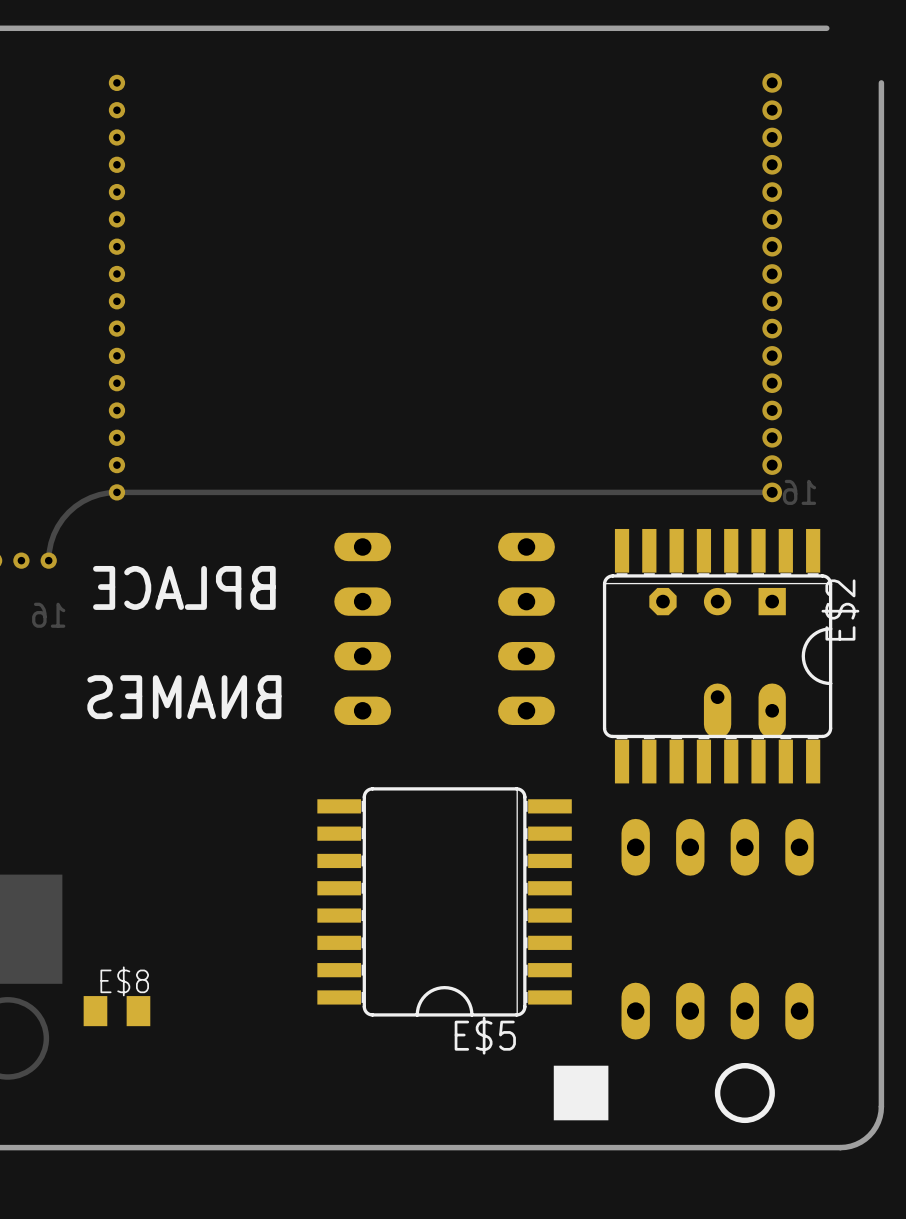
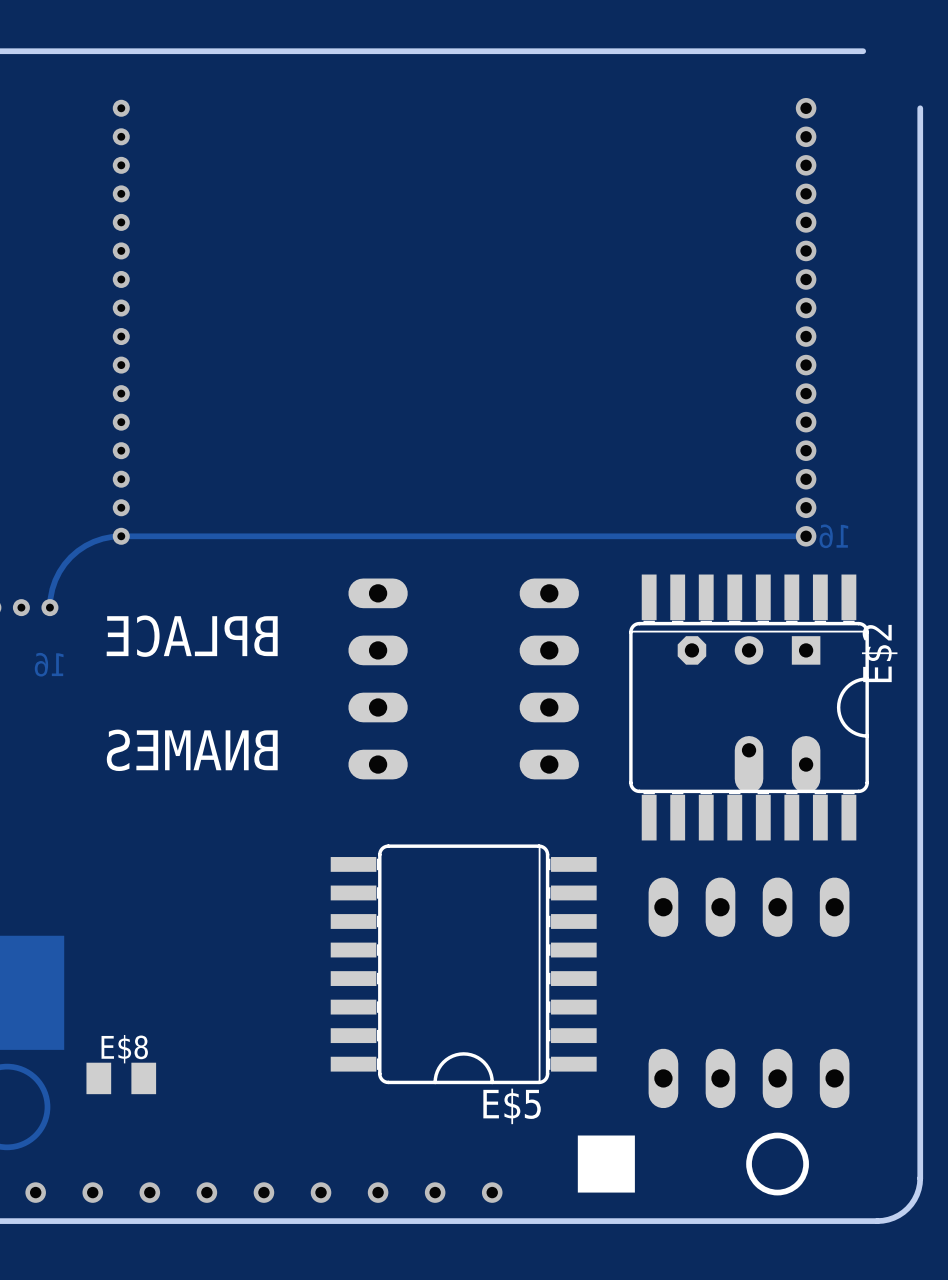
via: none -> (35, 1192)
via: none -> (92, 1192)
via: none -> (149, 1192)
via: none -> (206, 1192)
via: none -> (263, 1192)
via: none -> (321, 1192)
via: none -> (378, 1192)
via: none -> (435, 1192)
via: none -> (492, 1192)

